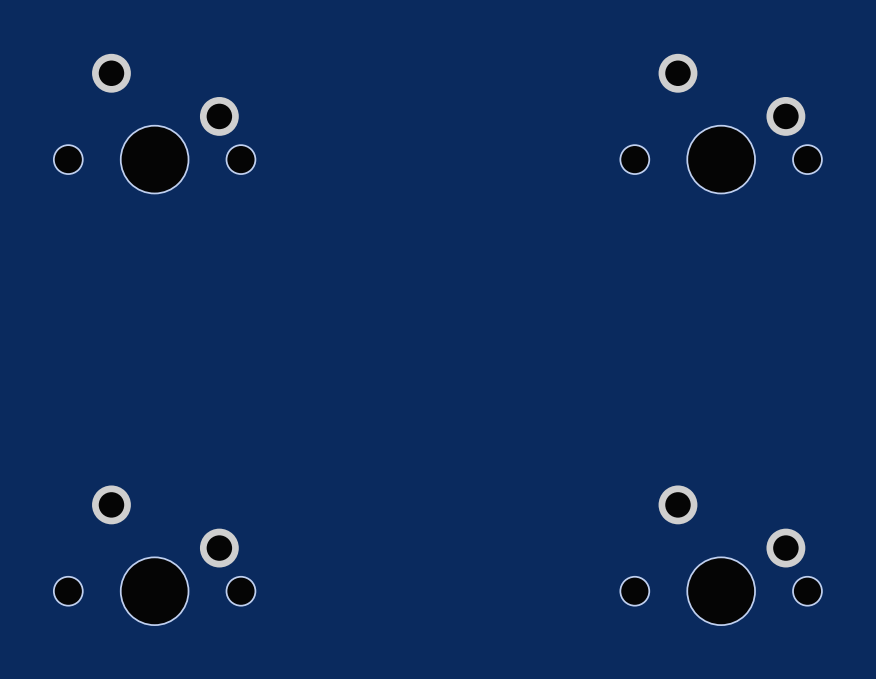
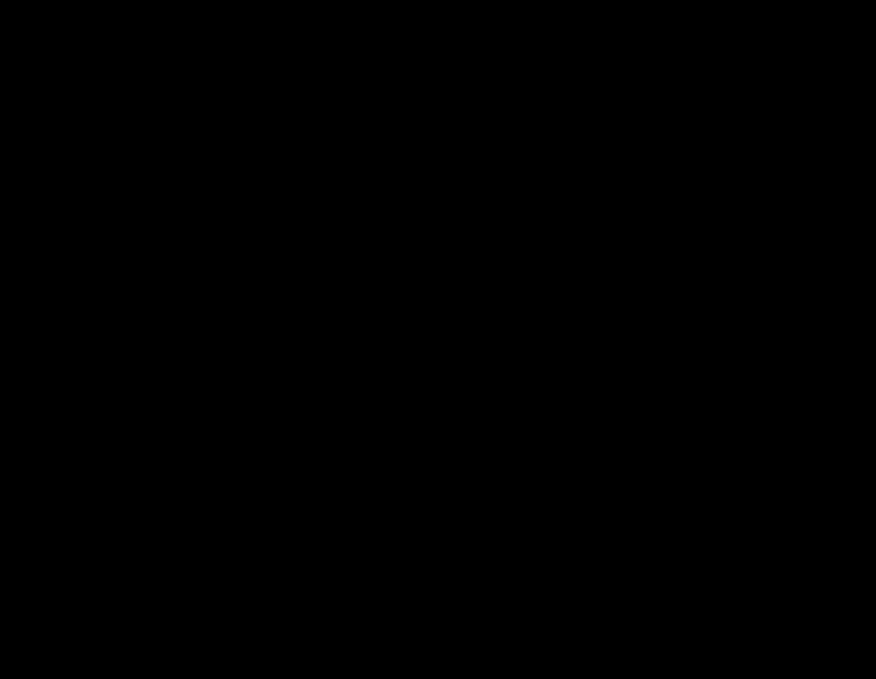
part: (154, 123) -> none
part: (721, 123) -> none
part: (154, 555) -> none
part: (721, 555) -> none

